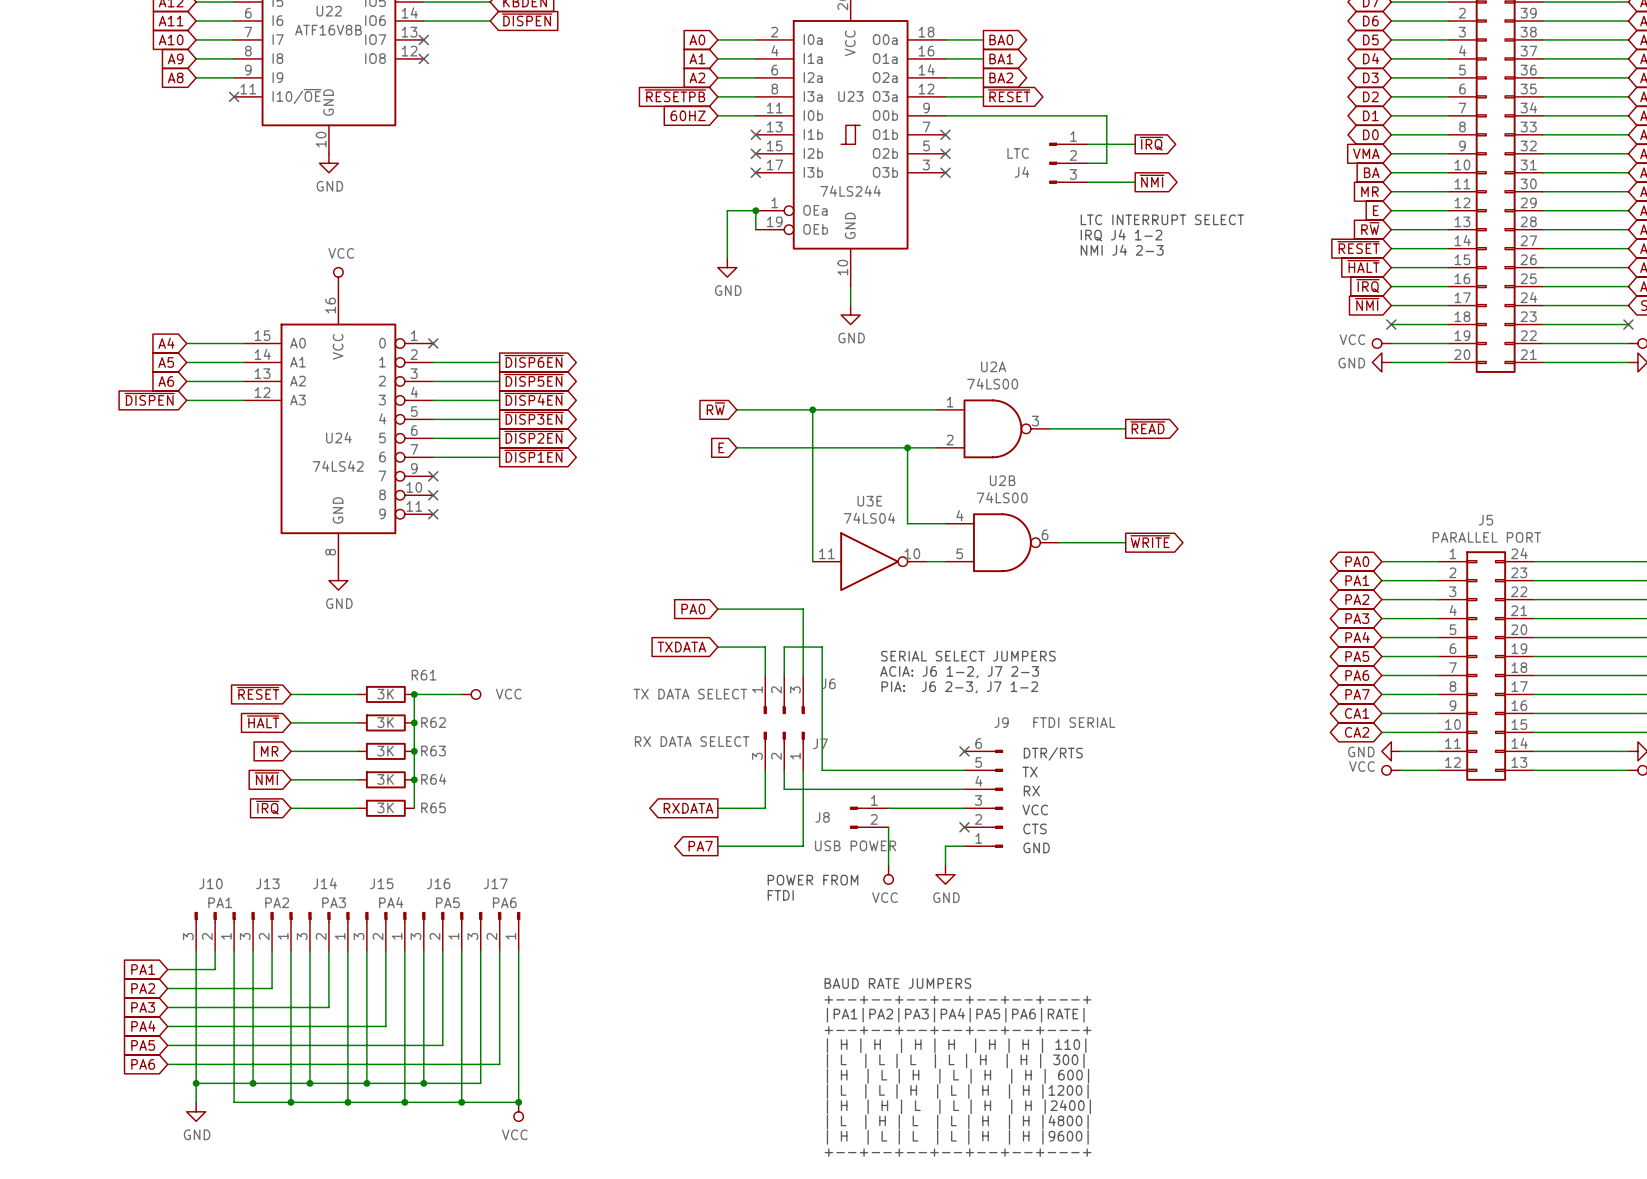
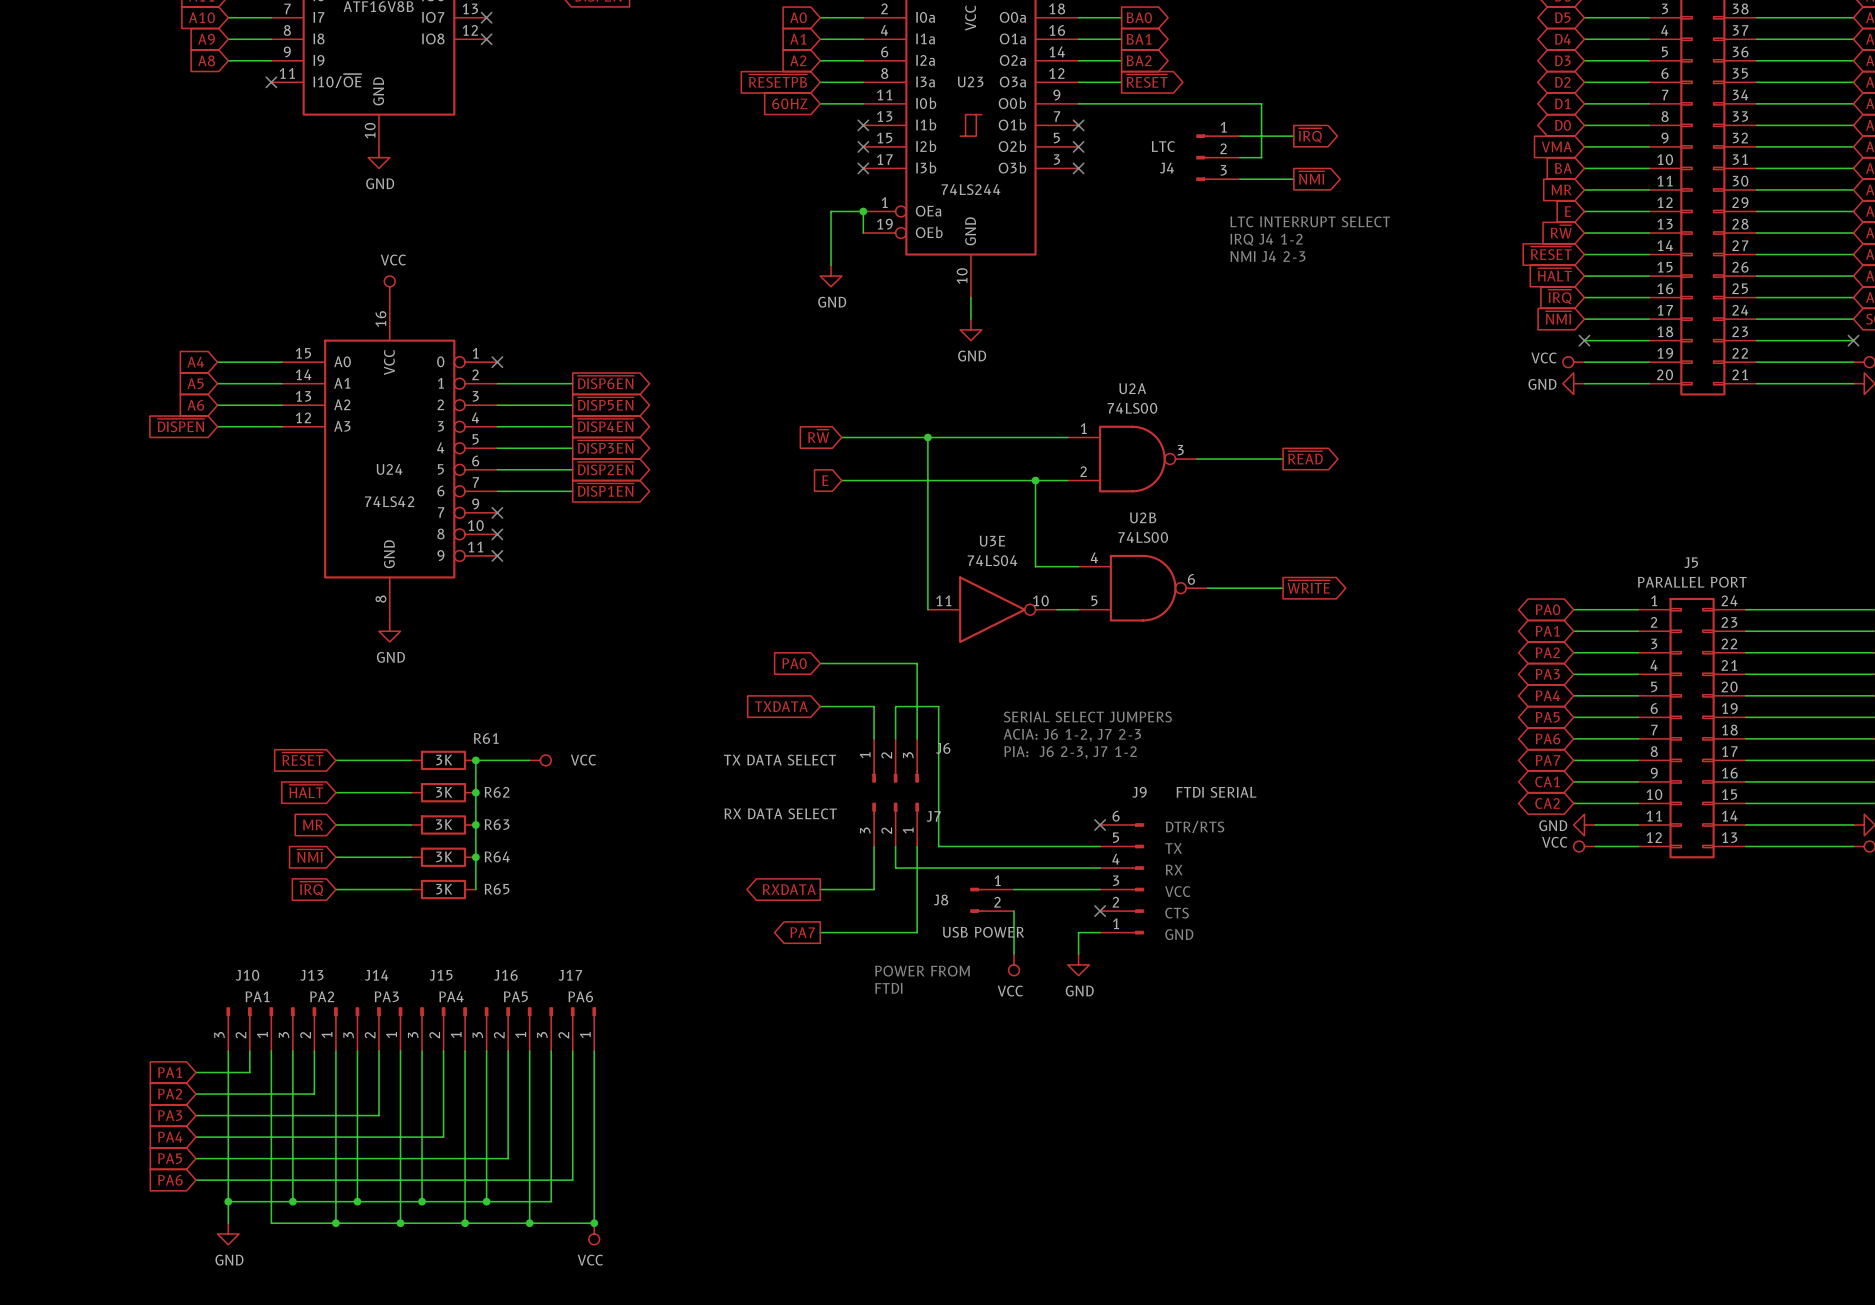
text: BAUD RATE JUMPERS (897, 983) -> none
text: +--+--+--+--+--+--+---+ (957, 999) -> none
text: |PA1|PA2|PA3|PA4|PA5|PA6|RATE| (955, 1015) -> none
text: +--+--+--+--+--+--+---+ (957, 1030) -> none
text: | H | H | H | H | H | H | 110| (956, 1045) -> none
text: | L | L | L | L | H | H | 300| (955, 1060) -> none
text: | H | L | H | L | H | H | 600| (957, 1076) -> none
text: | L | L | H | L | H | H |1200| (957, 1091) -> none
text: | H | H | L | L | H | H |2400| (958, 1106) -> none
text: | L | H | L | L | H | H |4800| (957, 1122) -> none
text: | H | L | L | L | H | H |9600| (957, 1137) -> none
text: +--+--+--+--+--+--+---+ (957, 1152) -> none

